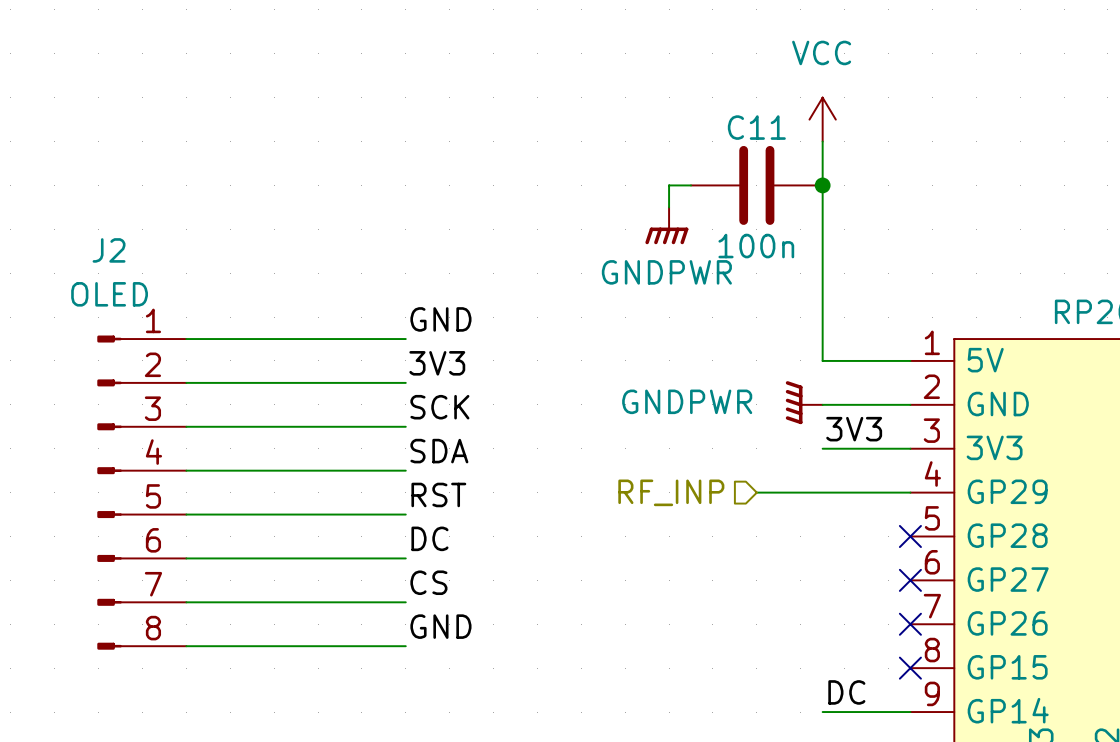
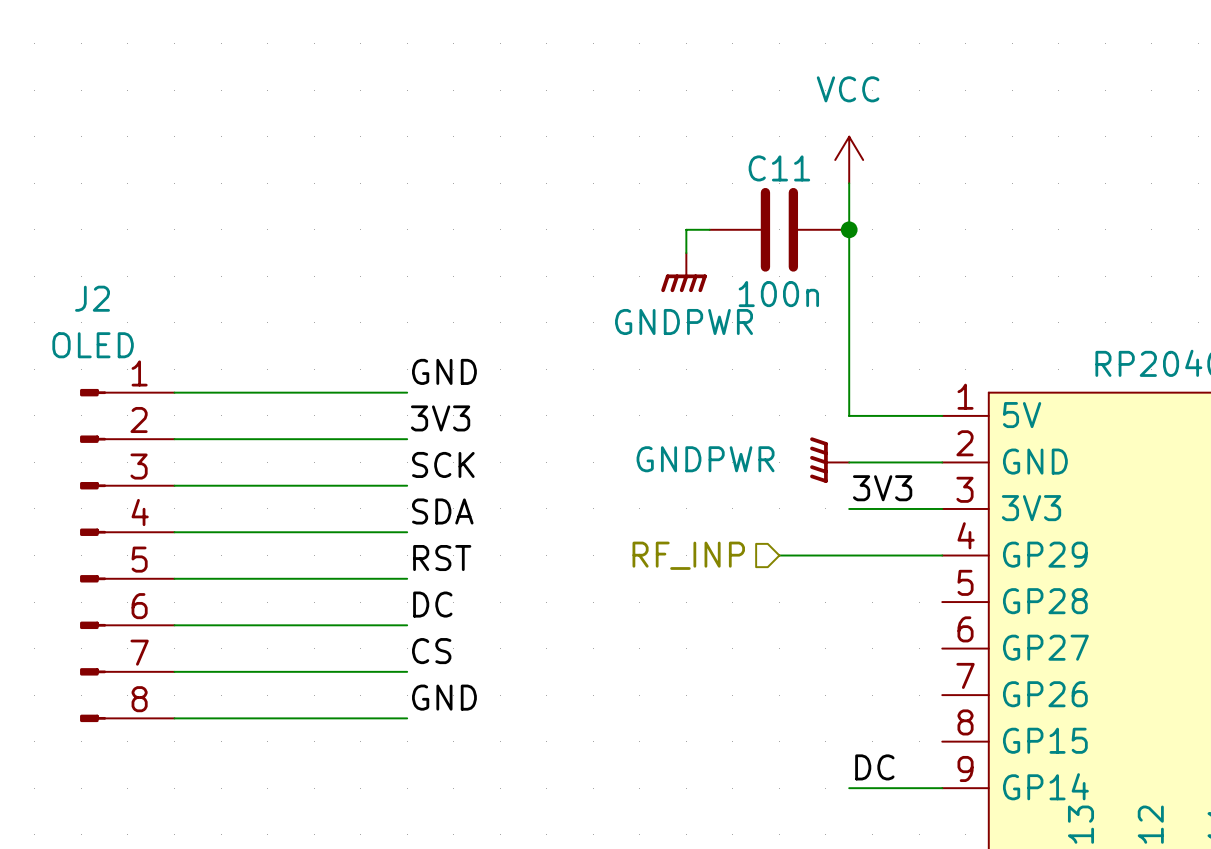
no-connect mark: (910, 536) -> none
no-connect mark: (910, 580) -> none
no-connect mark: (910, 624) -> none
no-connect mark: (910, 668) -> none

